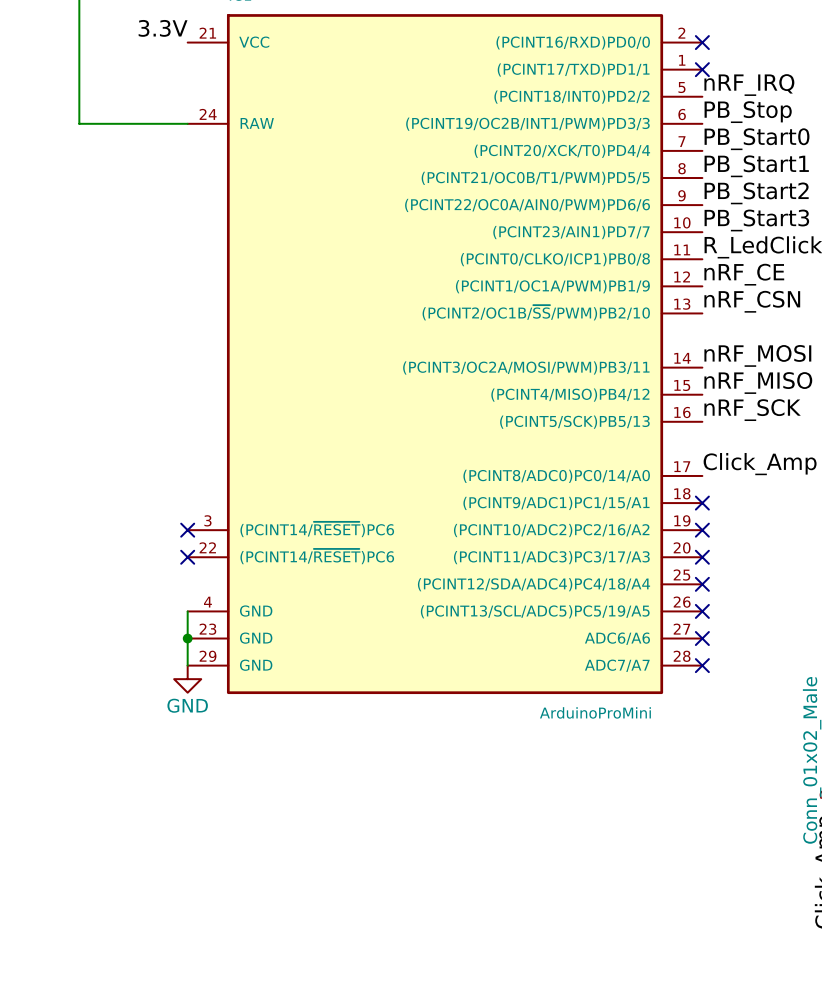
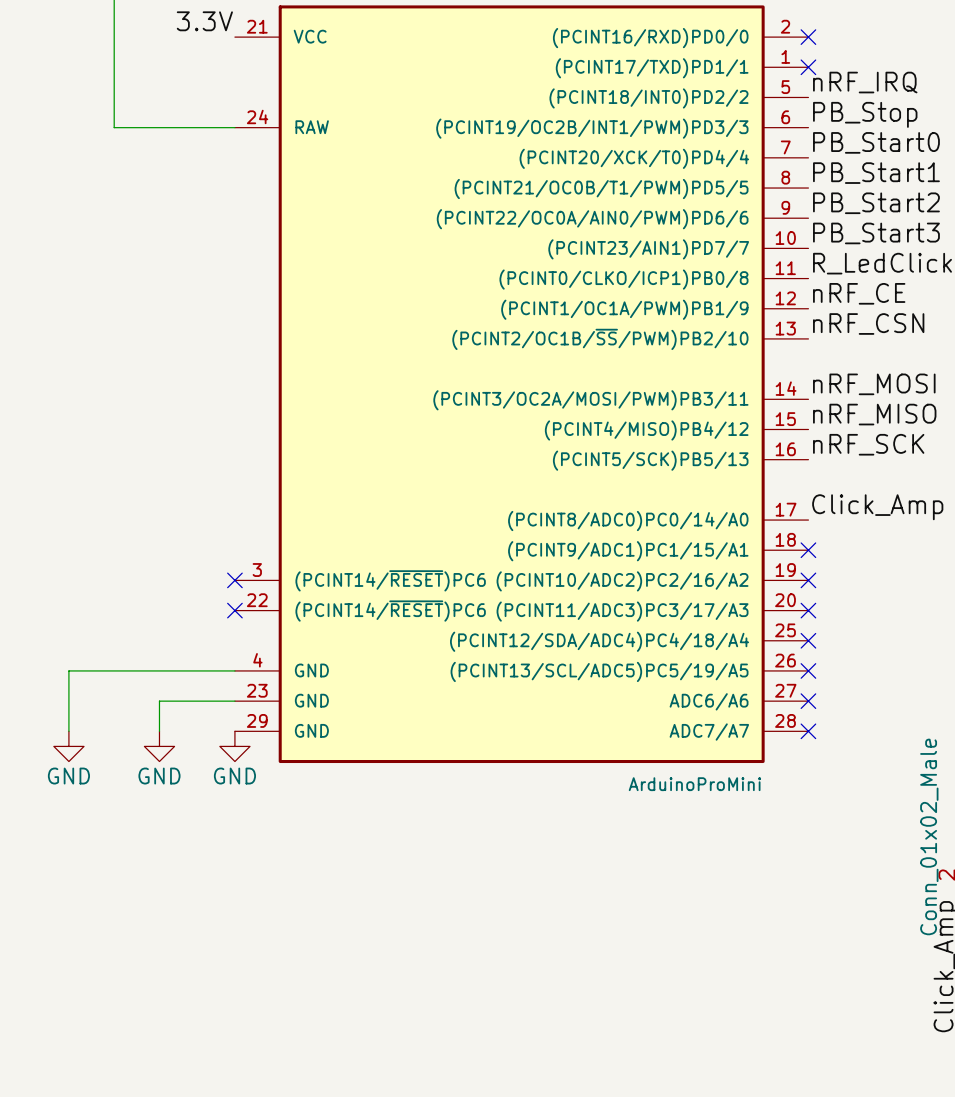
wire: (187, 611) (187, 665) -> (234, 670) (68, 670) (68, 731)
wire: none -> (234, 701) (159, 701) (159, 731)
junction: (187, 638) -> none
power symbol: none -> GND (68, 746)
power symbol: none -> GND (159, 746)

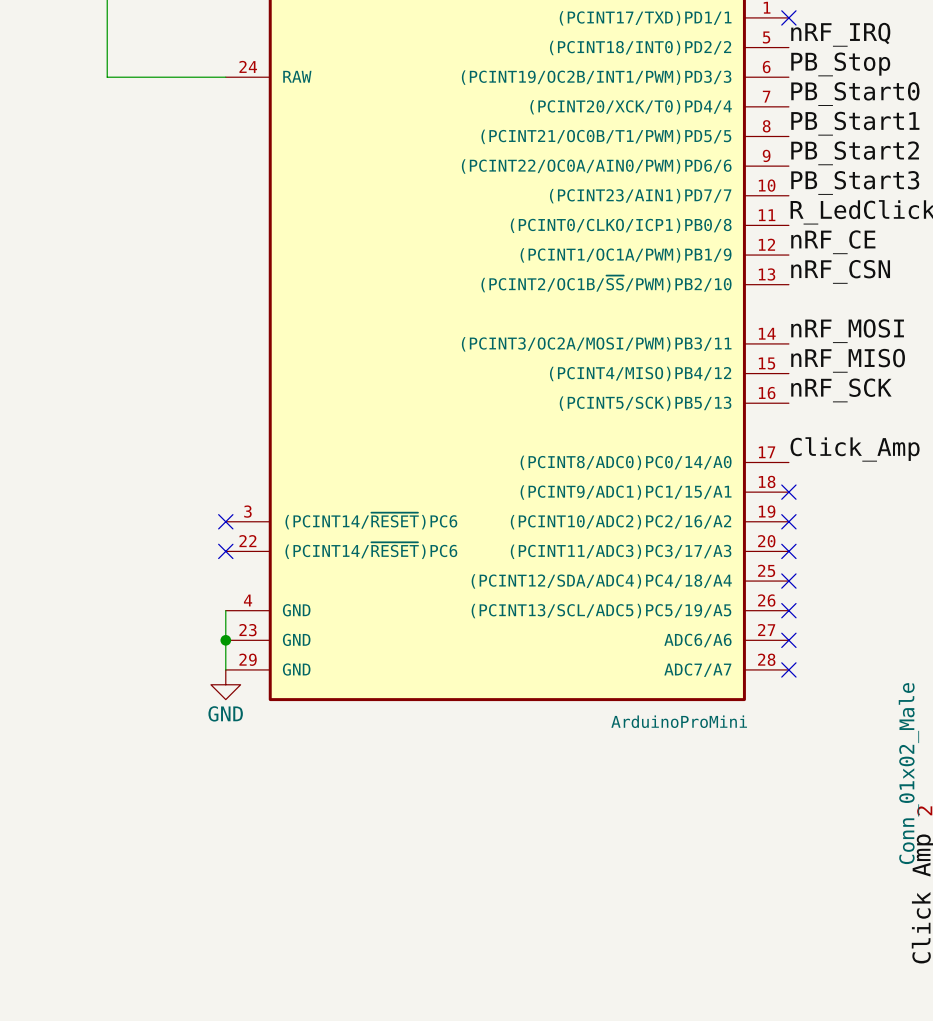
wire: (234, 670) (68, 670) (68, 731) -> (225, 610) (225, 669)
wire: (234, 701) (159, 701) (159, 731) -> none
junction: none -> (225, 640)
power symbol: GND (68, 746) -> none
power symbol: GND (159, 746) -> none

